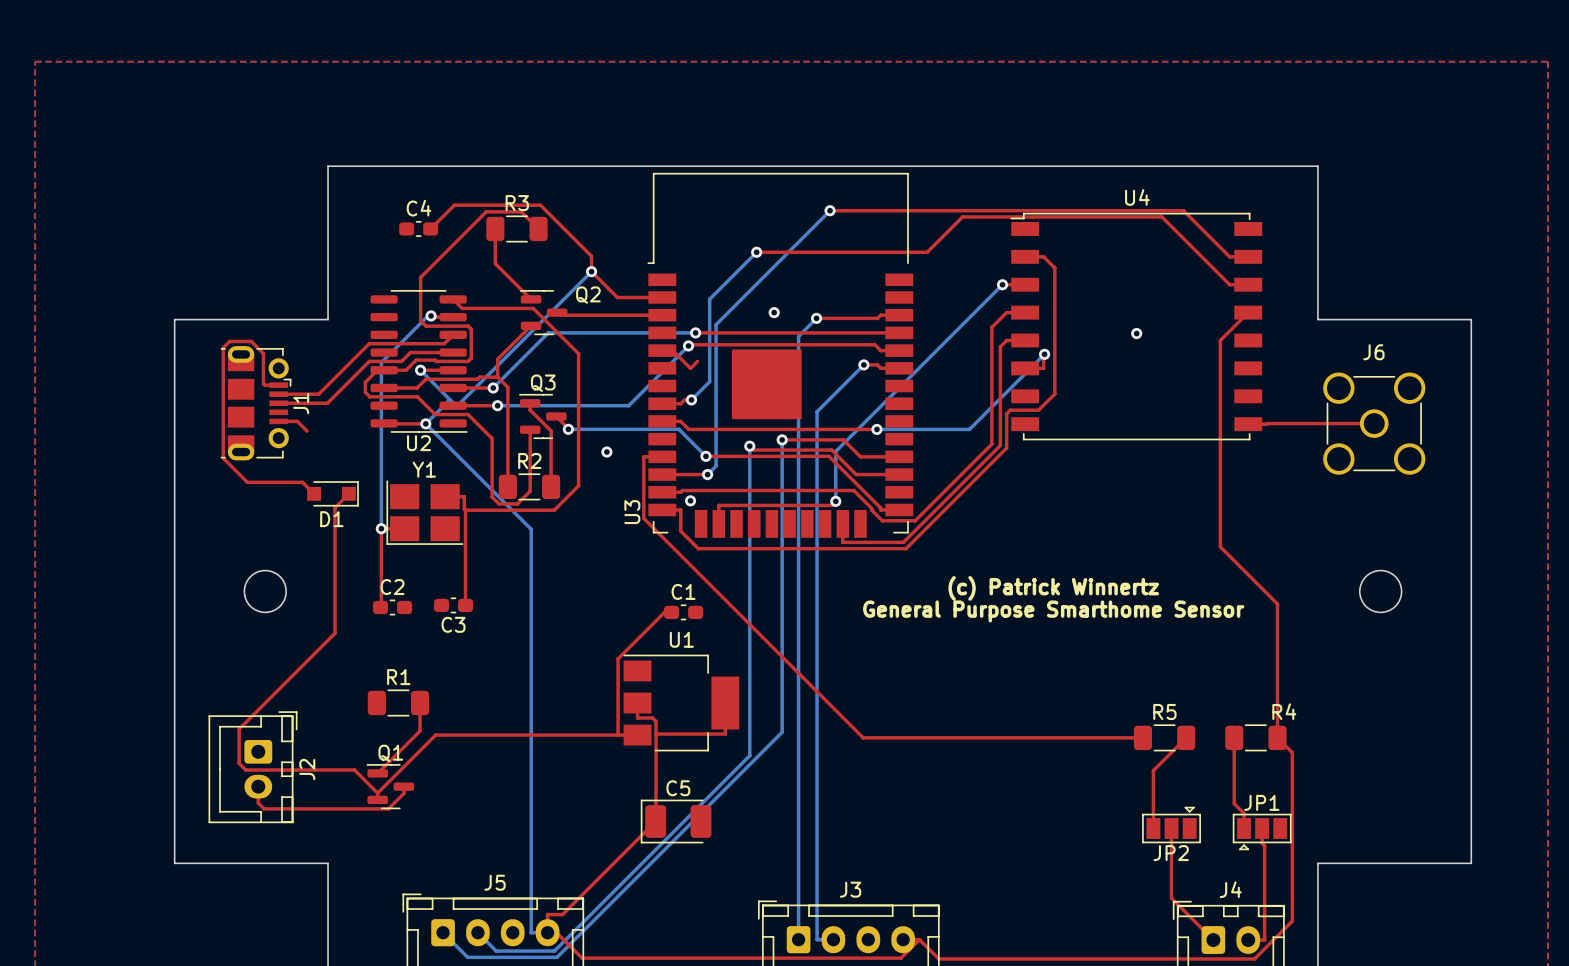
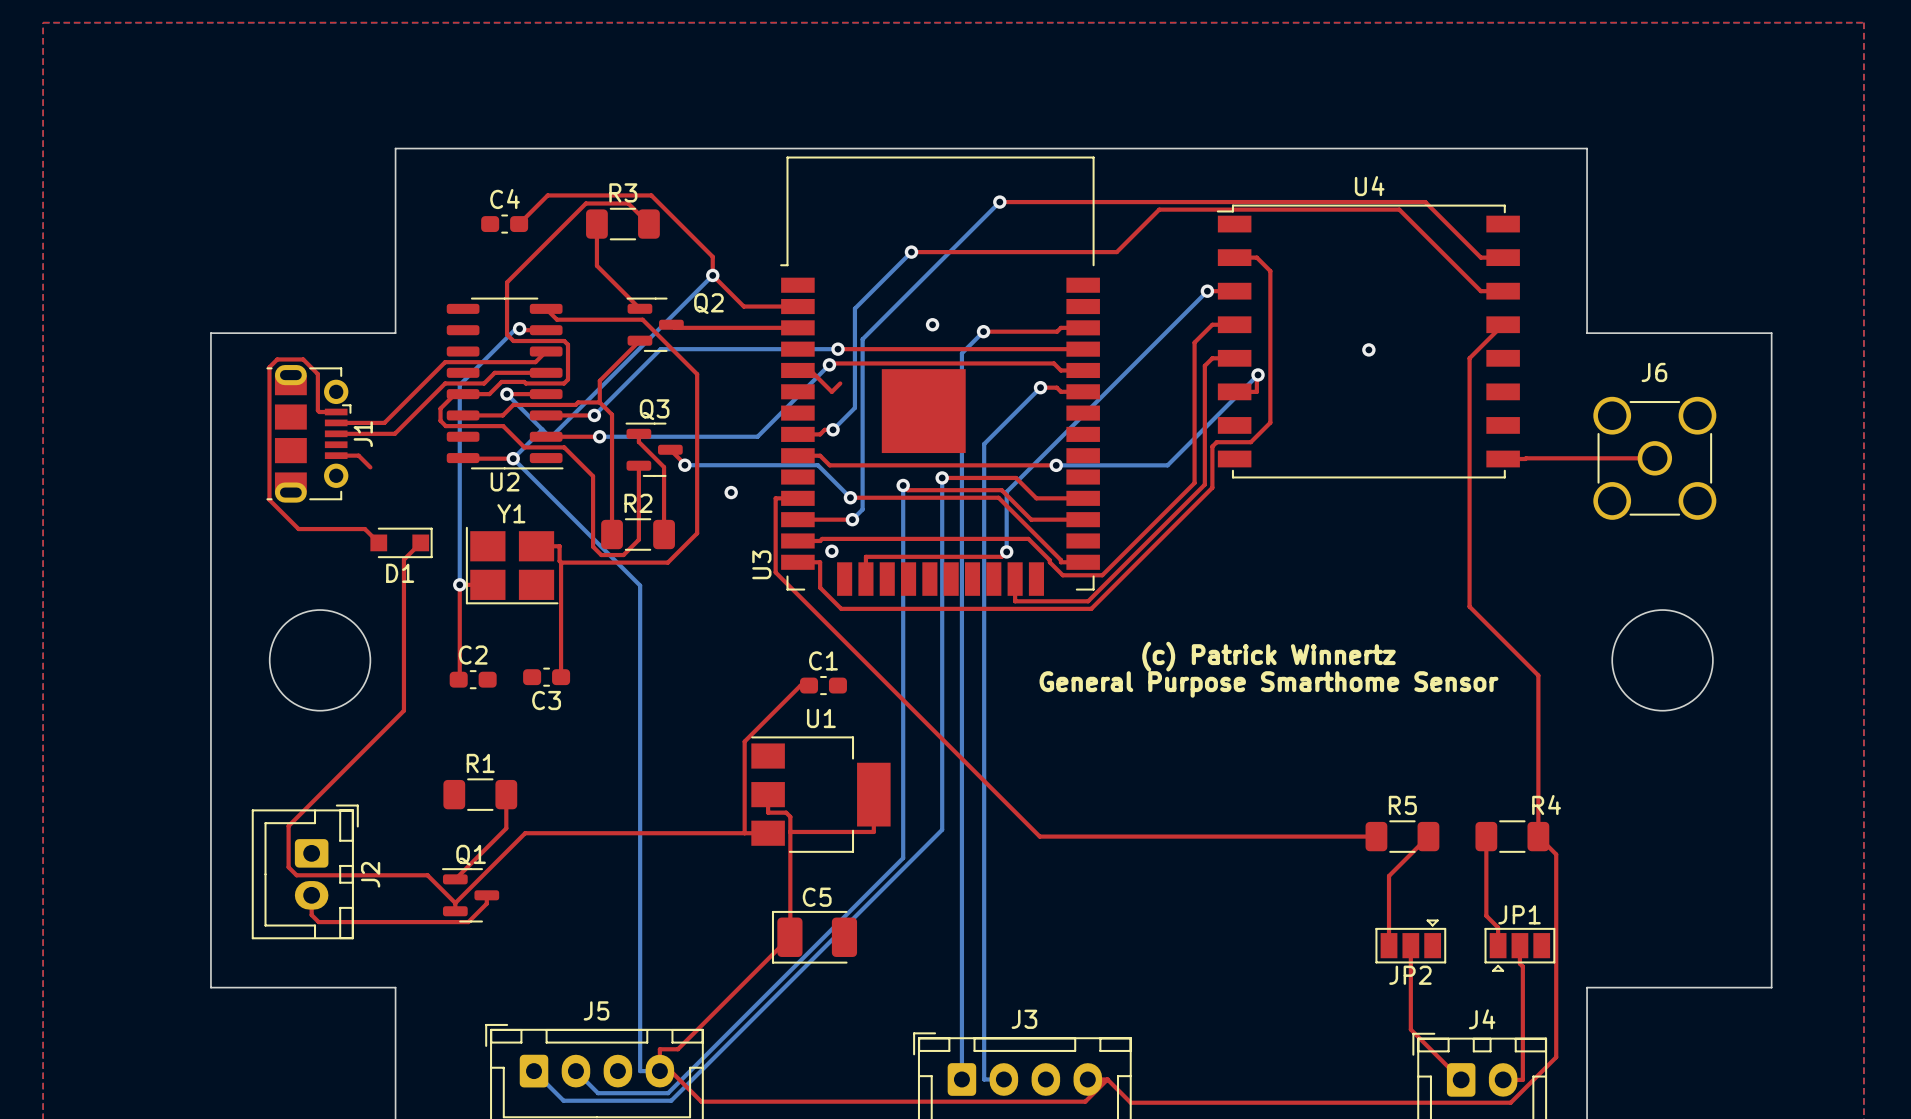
round board edge size: [243, 569, 287, 614] -> [268, 609, 372, 712]
round board edge size: [1359, 569, 1403, 614] -> [1611, 609, 1714, 712]

